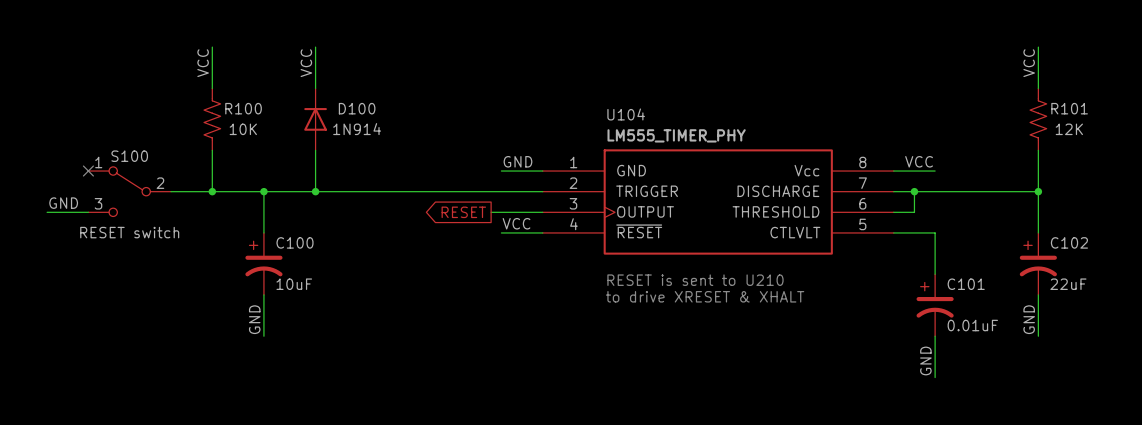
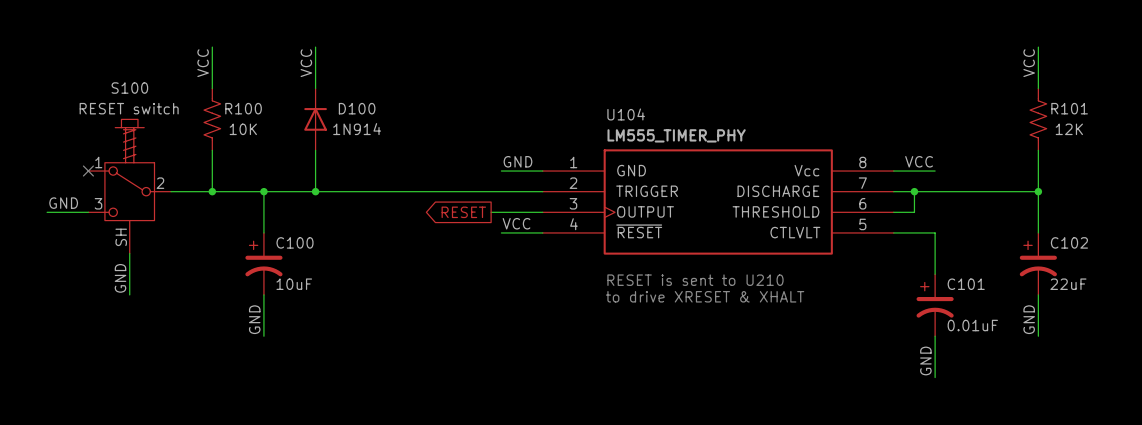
S100 name position: S100 (129, 156) -> S100 (129, 88)
S100 symbol: [88, 166, 172, 217] -> [88, 119, 172, 254]
S100 value position: RESET switch (129, 232) -> RESET switch (129, 108)
wire: none -> (129, 253) (129, 294)
label: none -> GND (120, 278)

